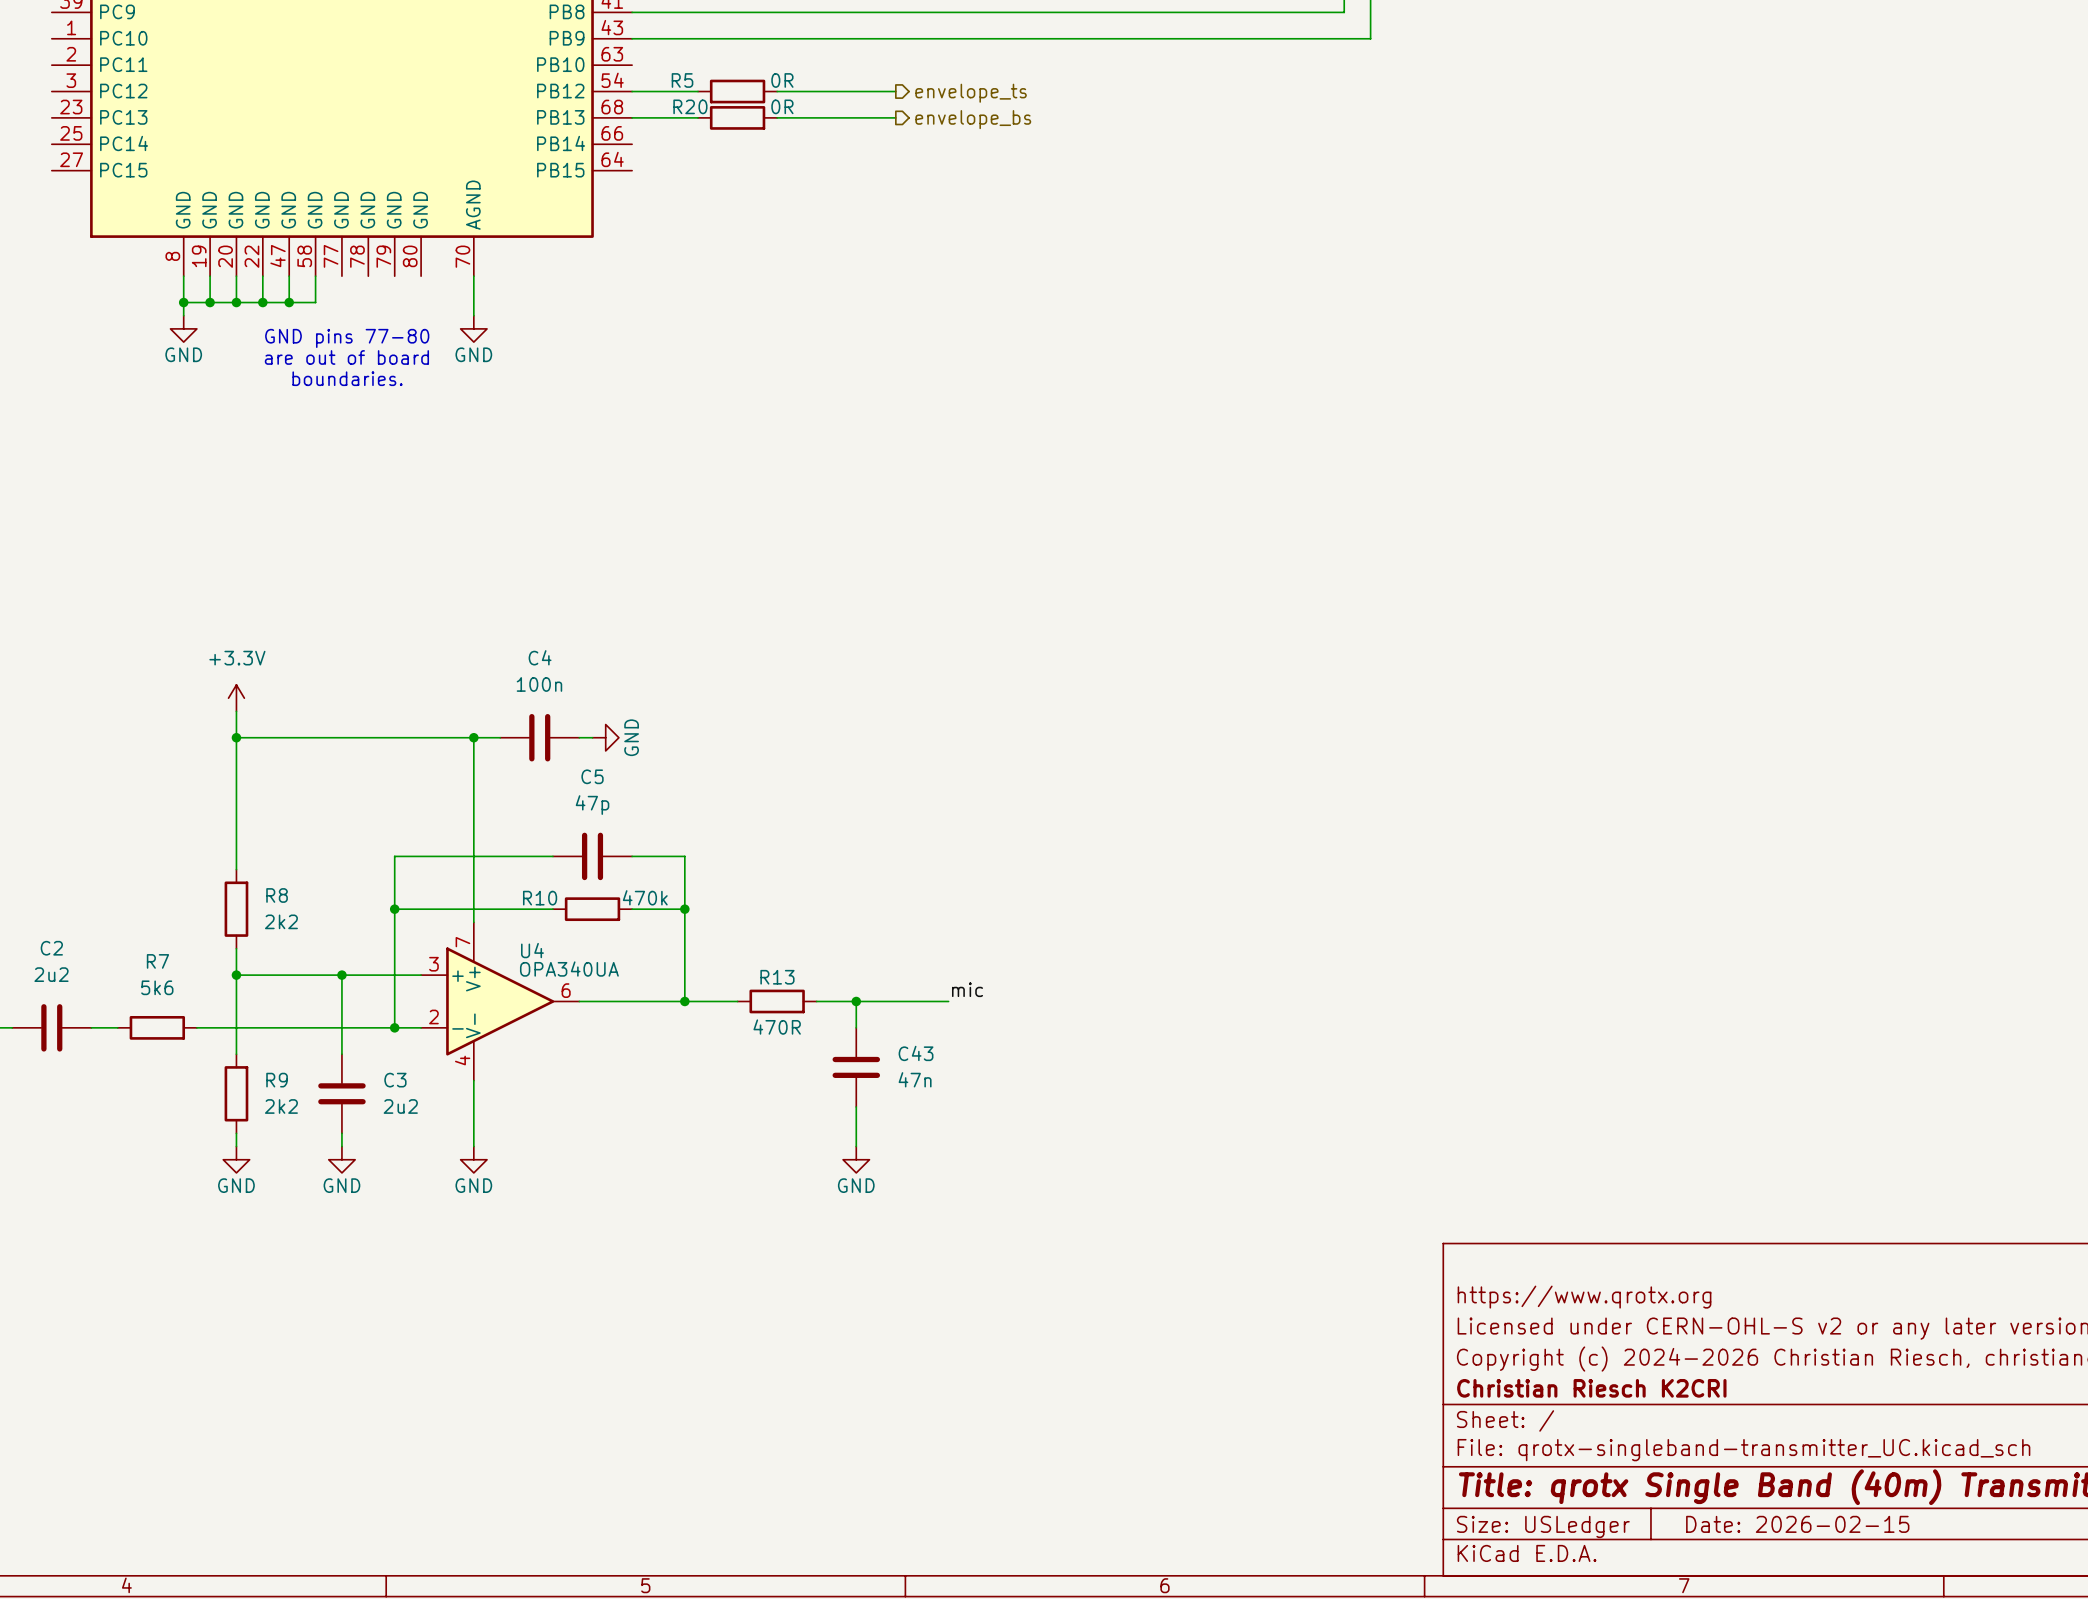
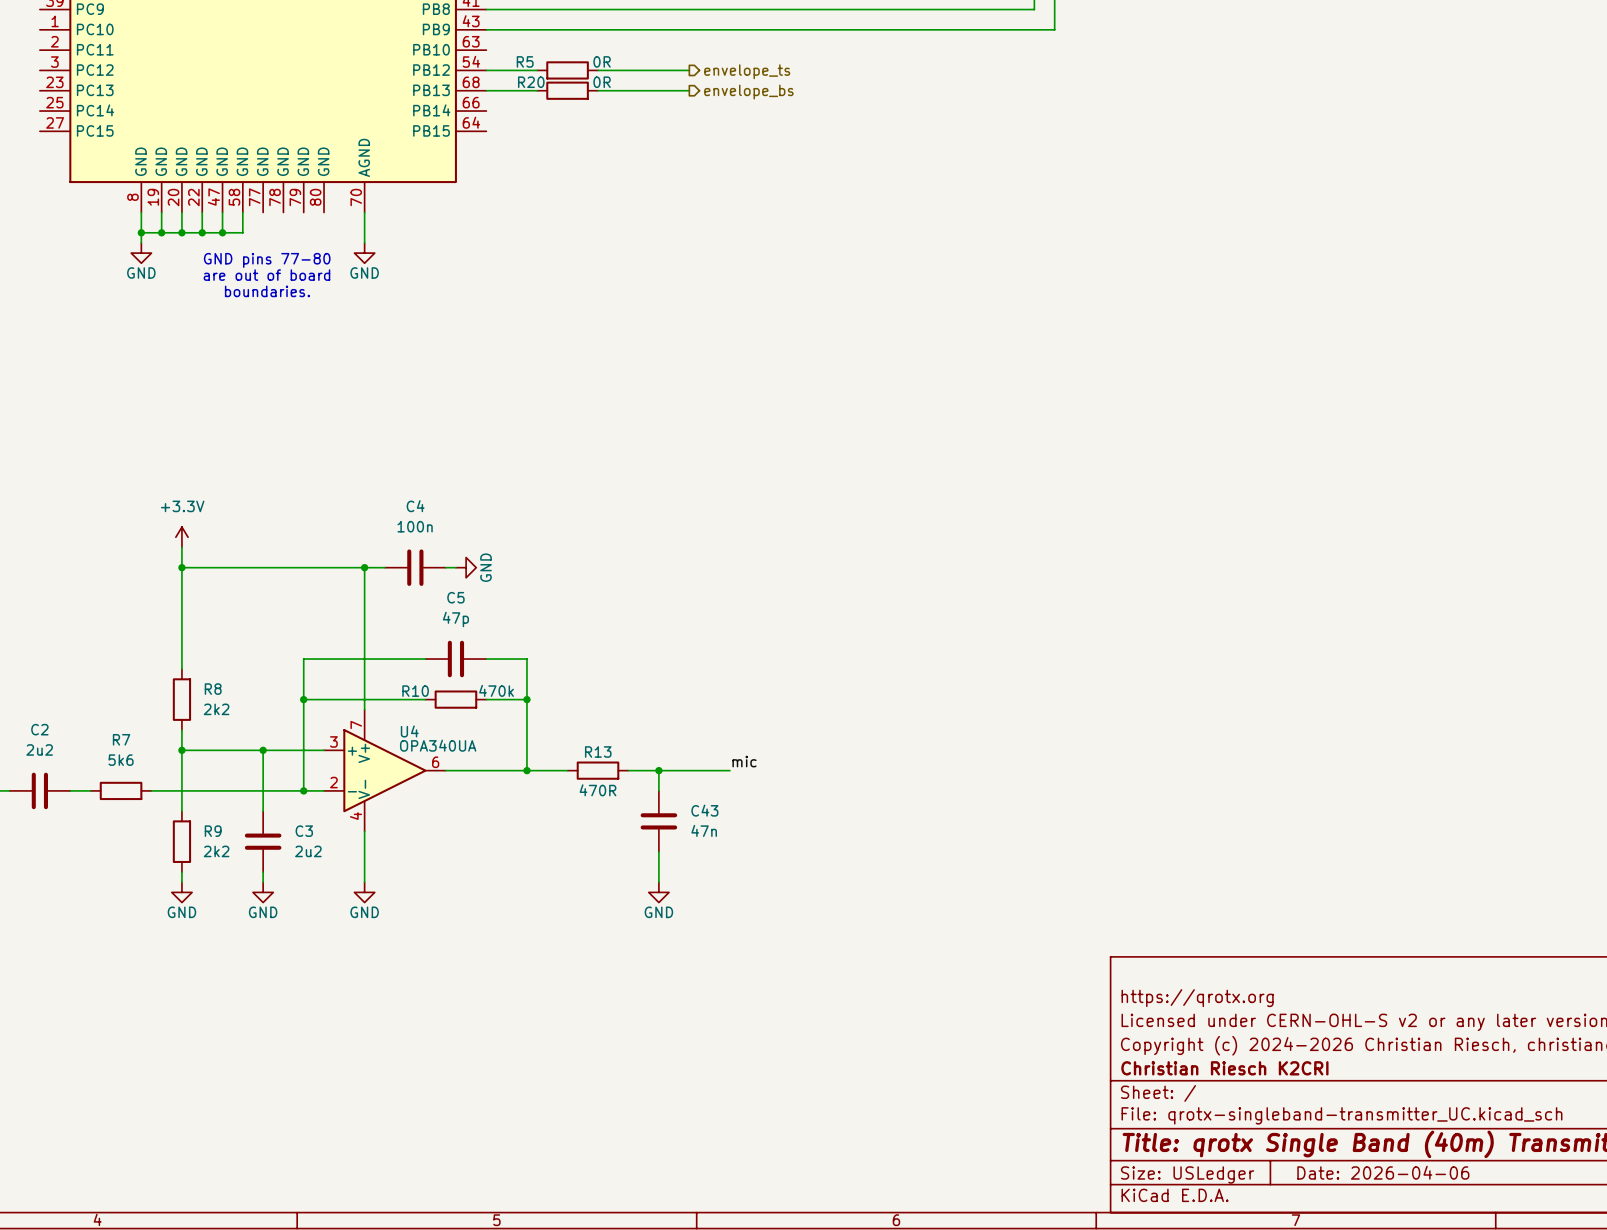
title block: https://www.qrotx.org (1584, 1297) -> https://qrotx.org (1197, 998)
title block: Date: 2026-02-15 (1797, 1524) -> Date: 2026-04-06 (1383, 1172)

